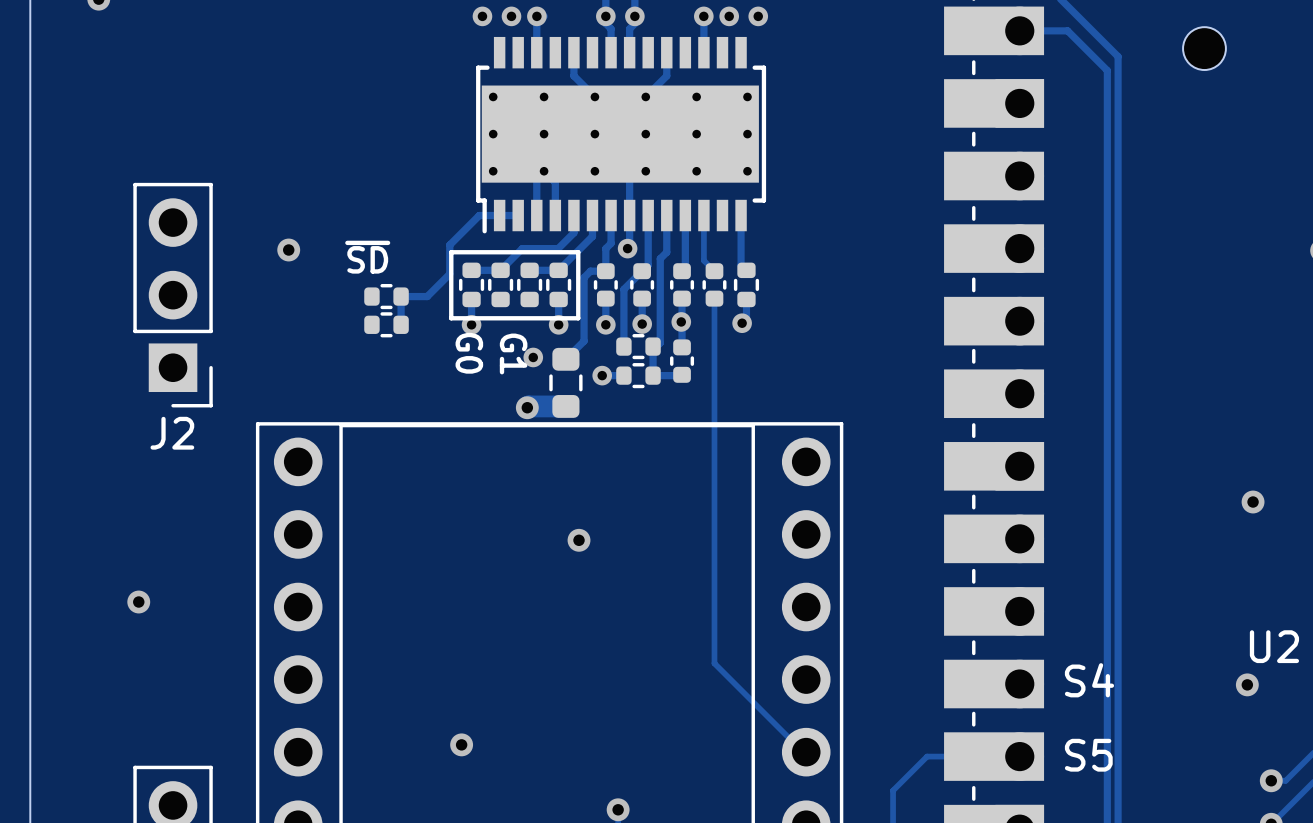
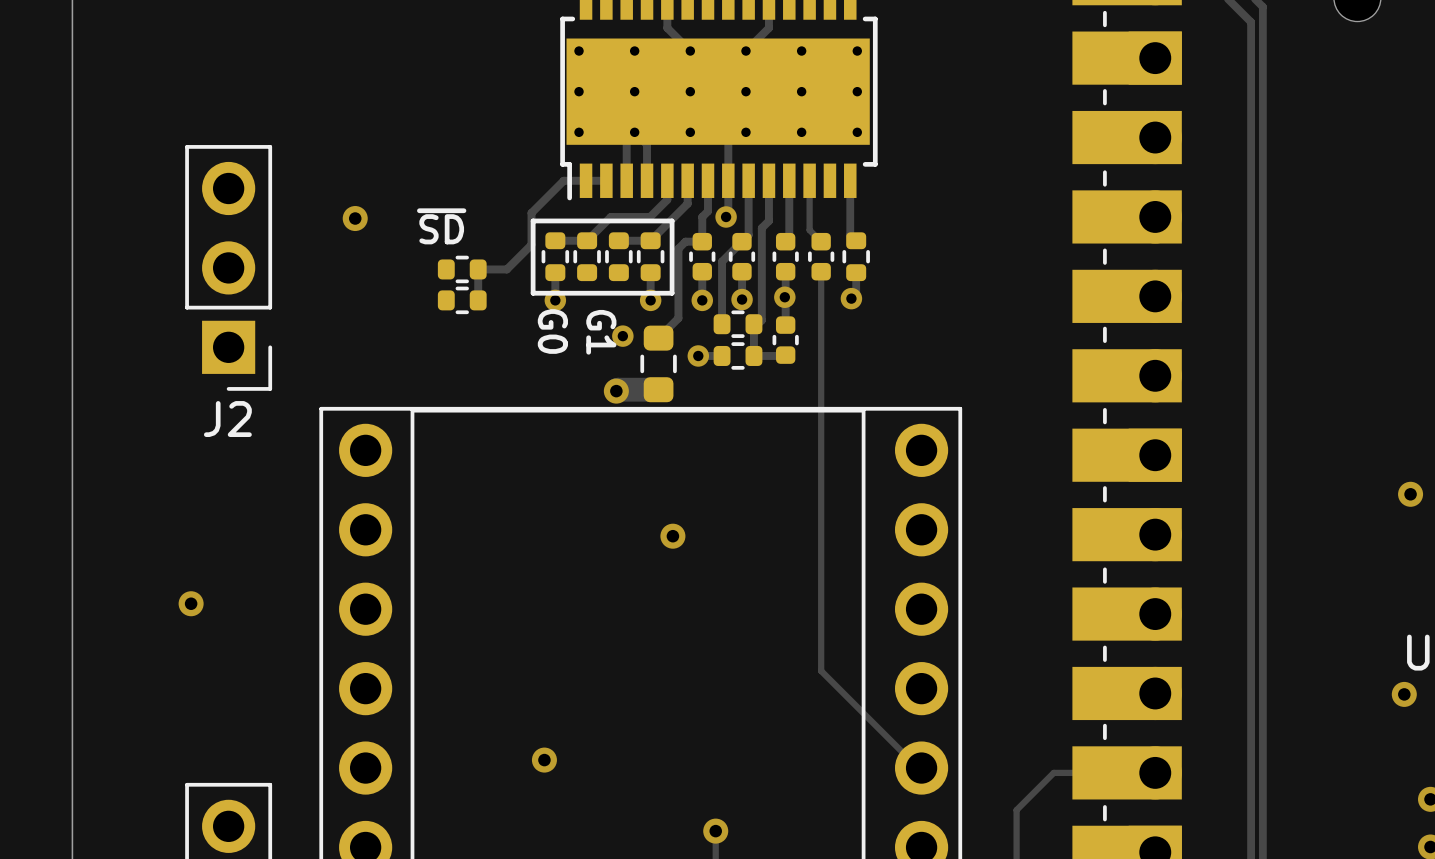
text: S4 (1089, 680) -> none
text: S5 (1088, 755) -> none

